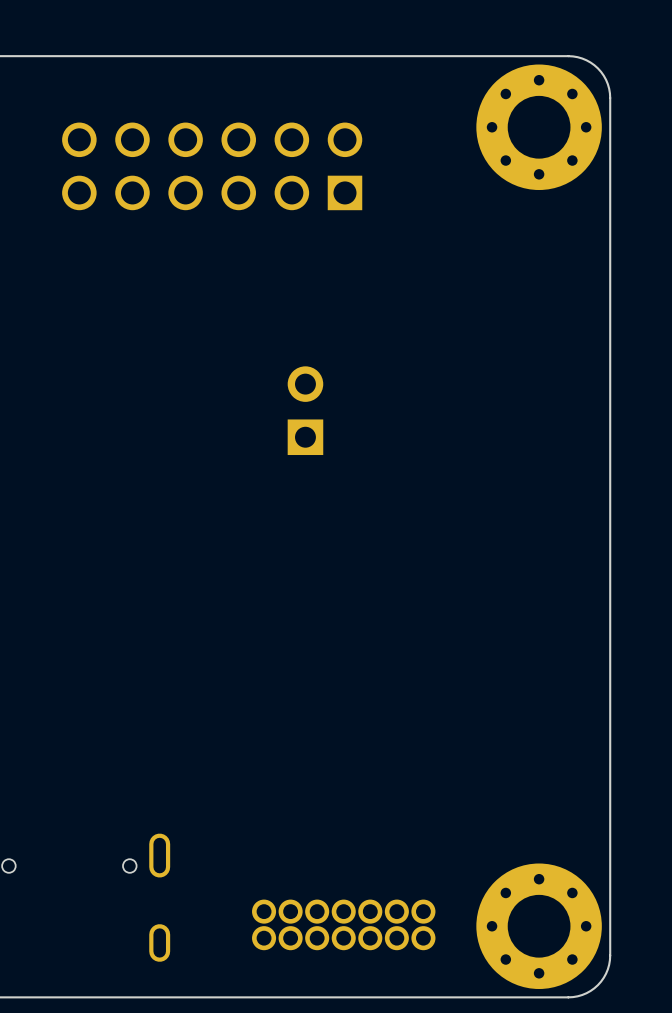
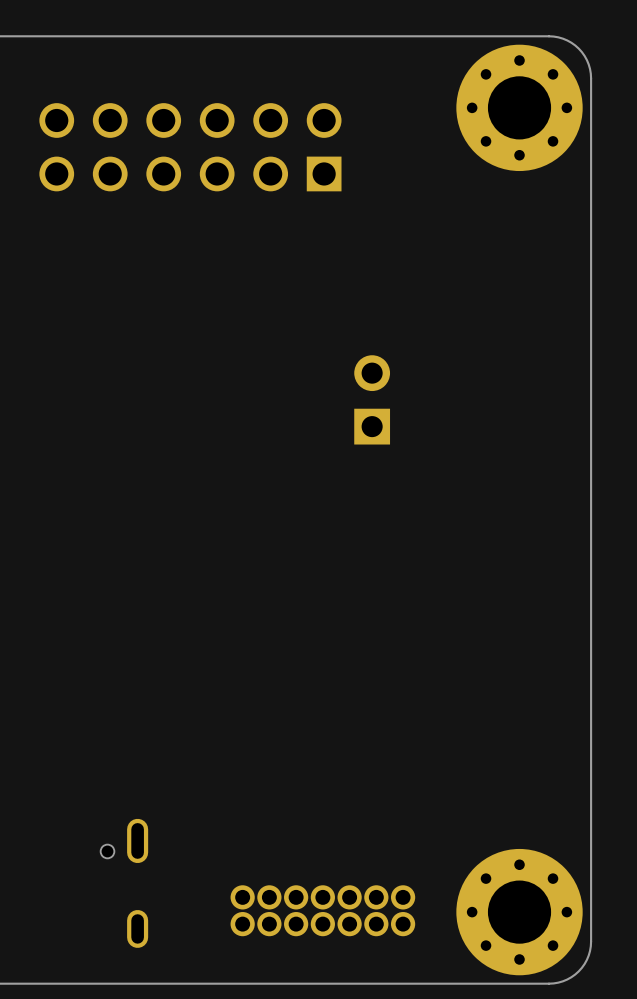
part position: (305, 410) -> (372, 399)

